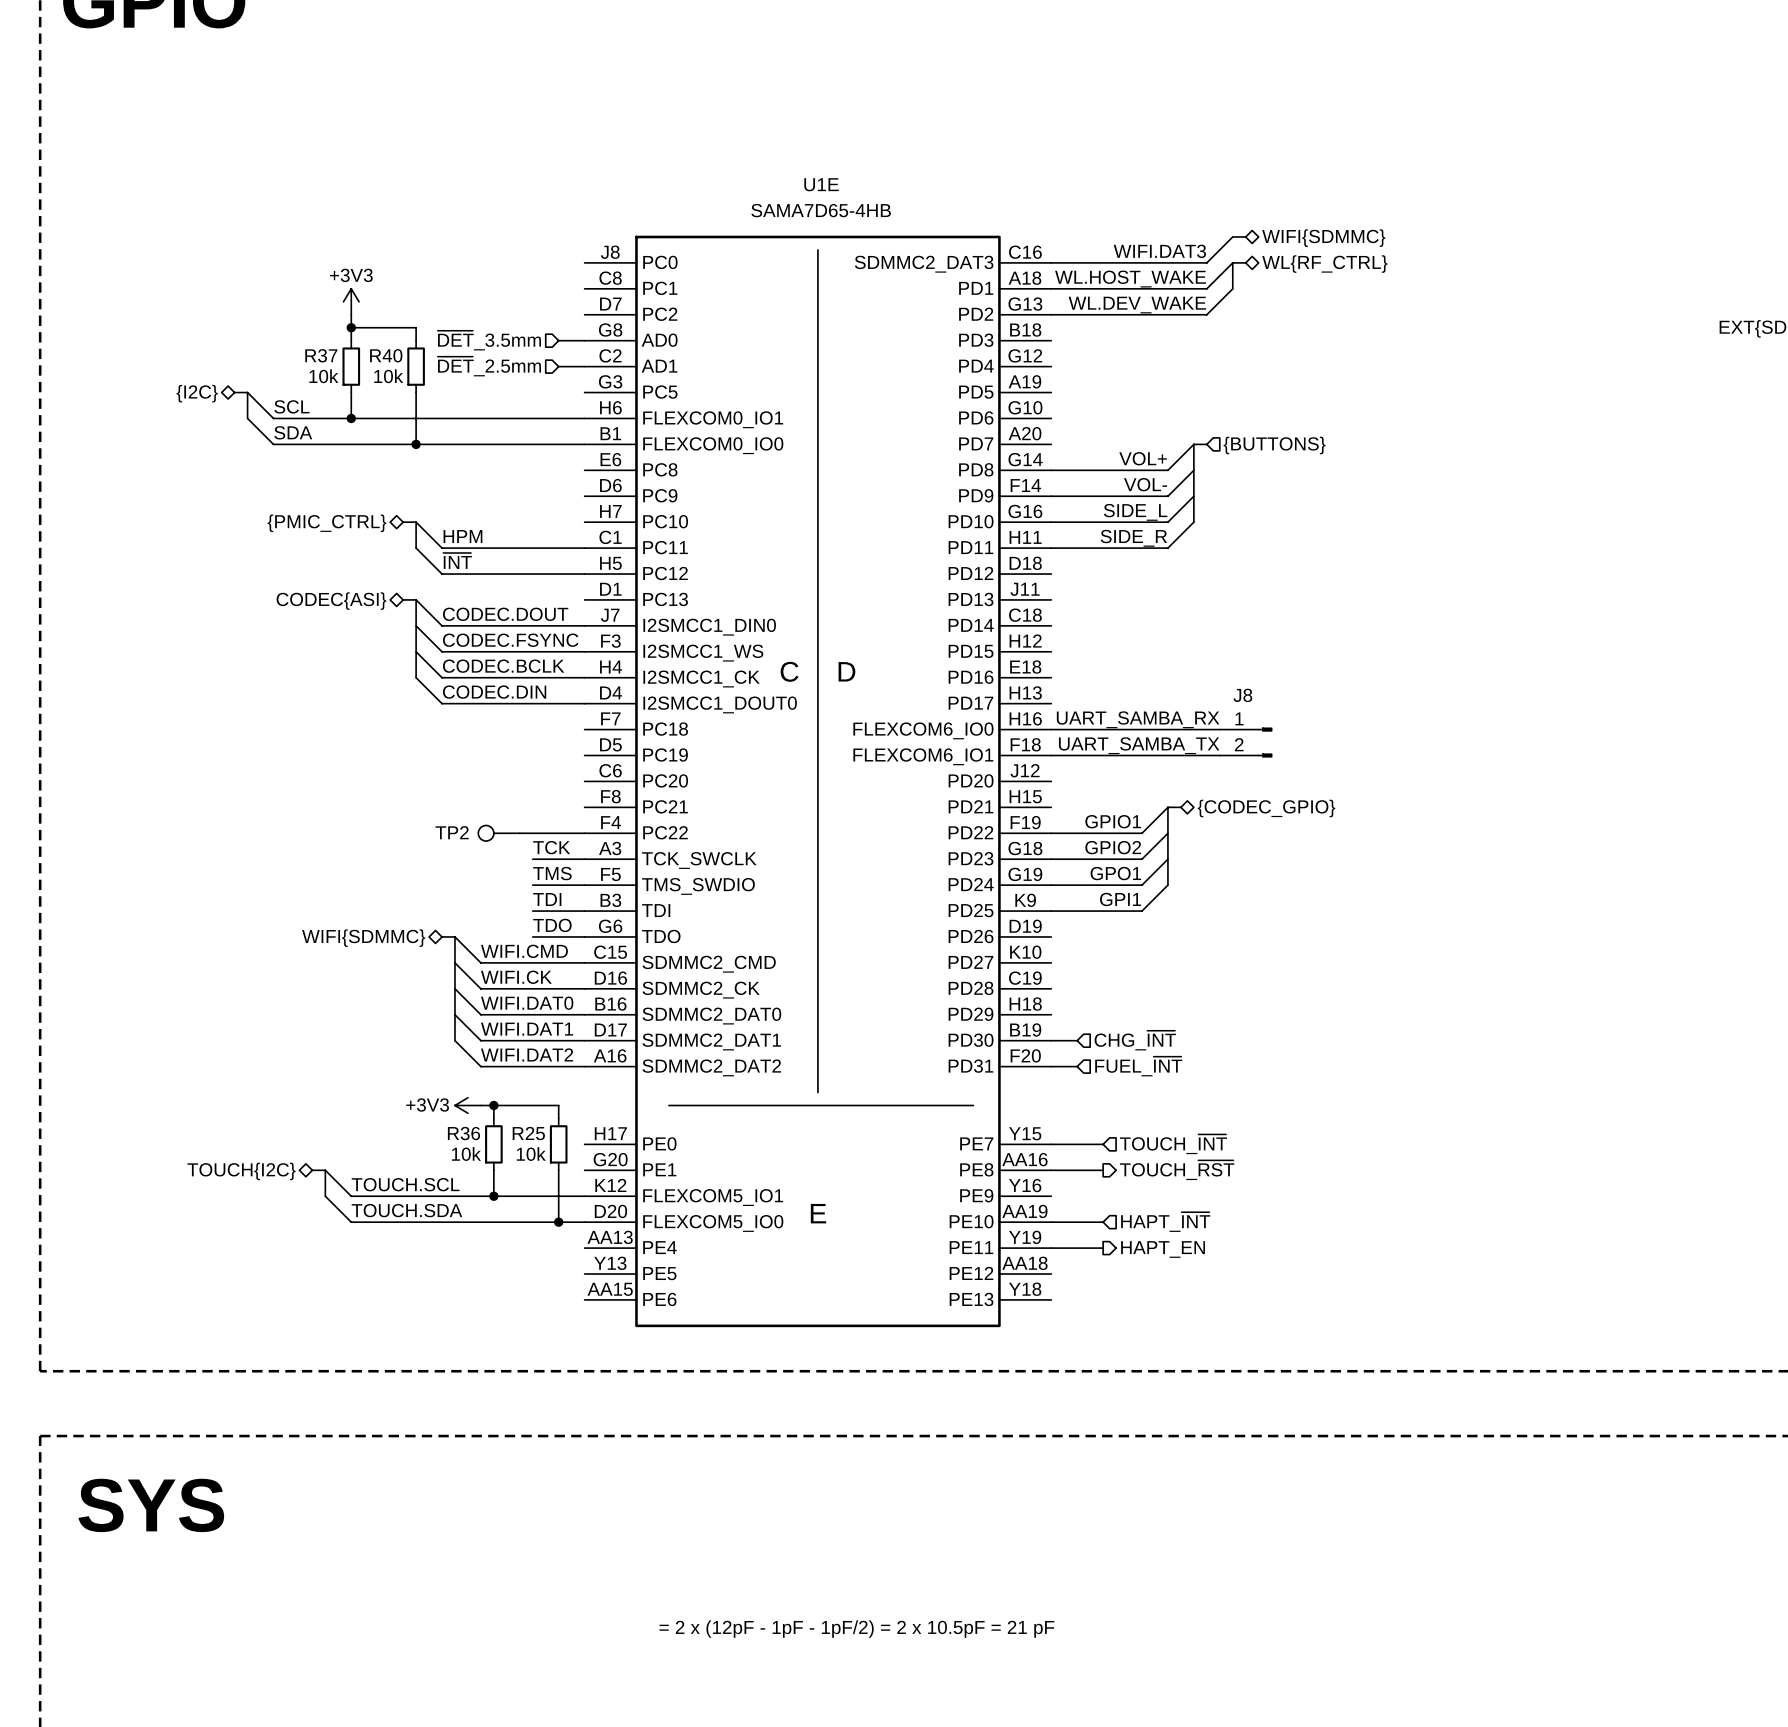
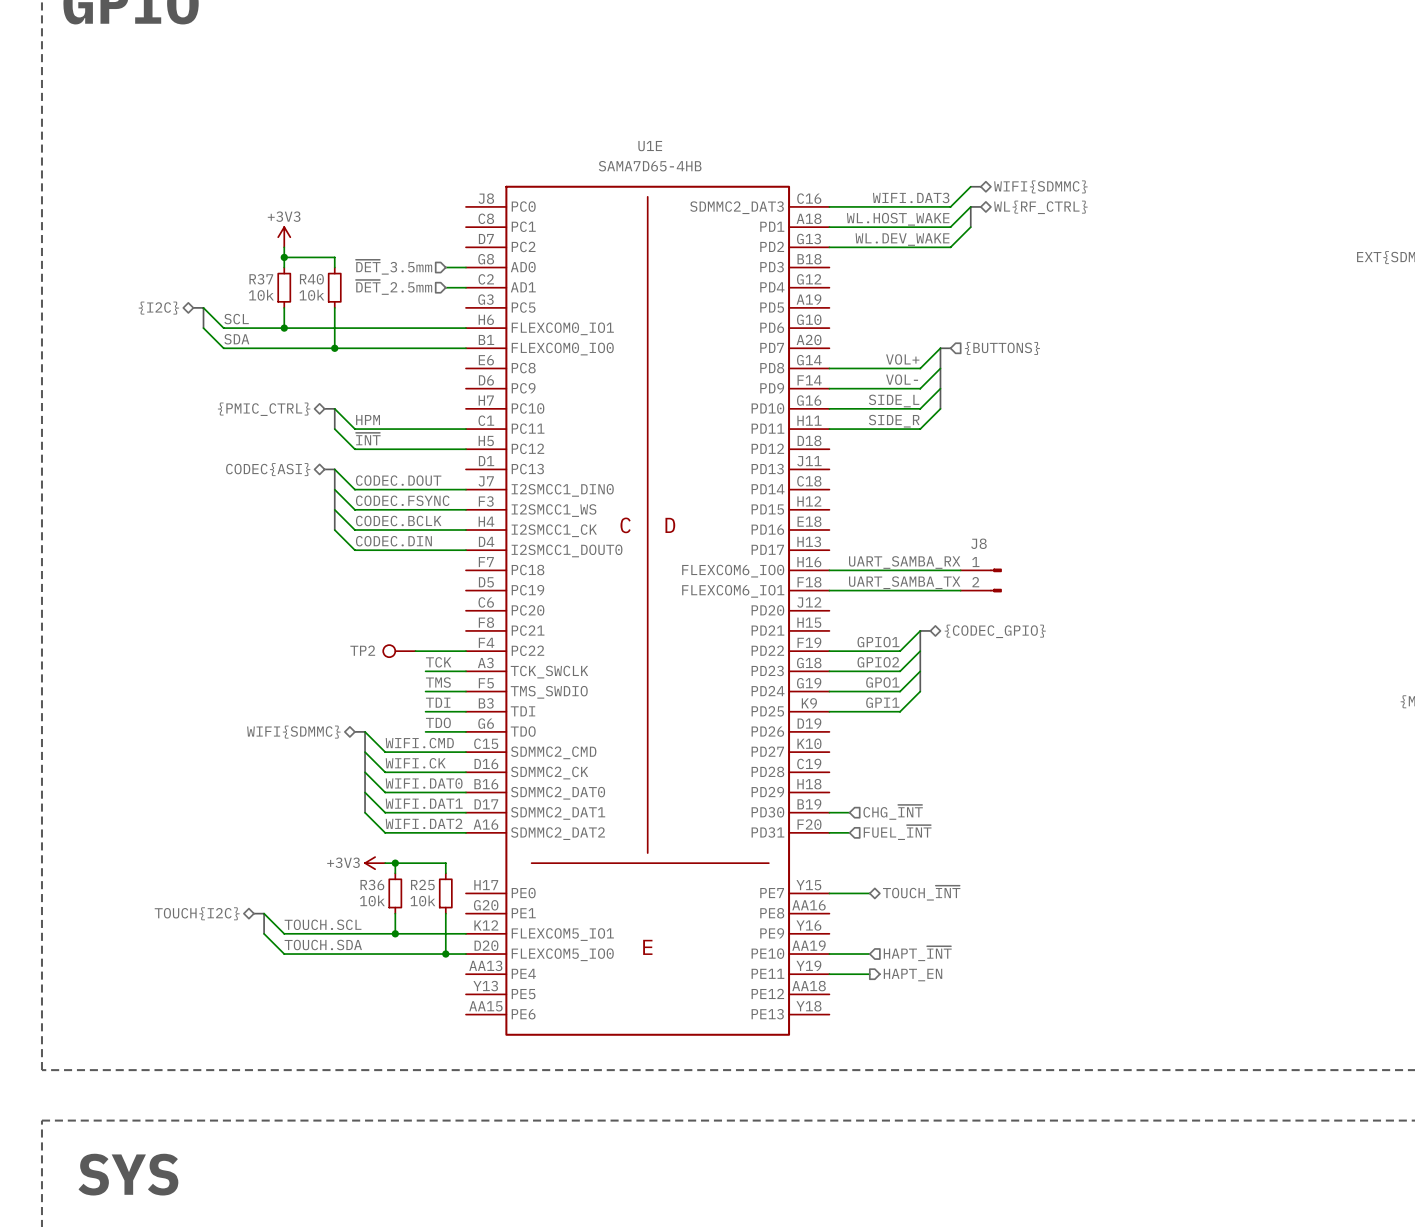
hierarchical label shape: input (1173, 1144) -> bidirectional (921, 893)
wire: (1051, 1170) (1103, 1170) -> none
hierarchical label: TOUCH_~{RST} (1177, 1170) -> none

